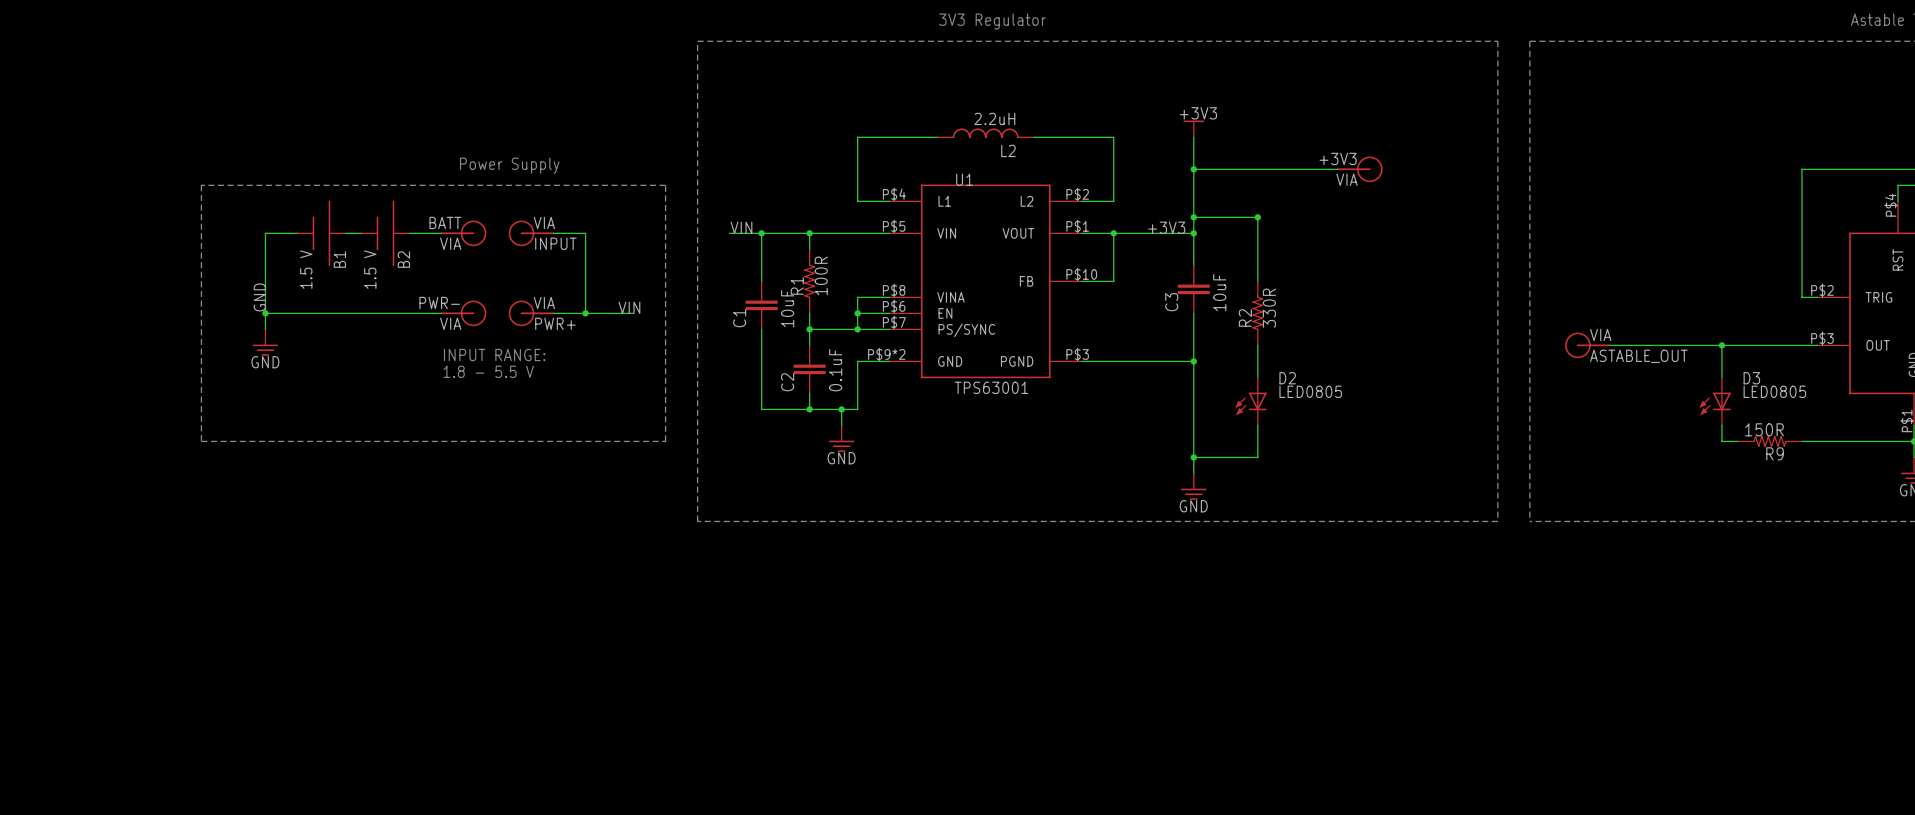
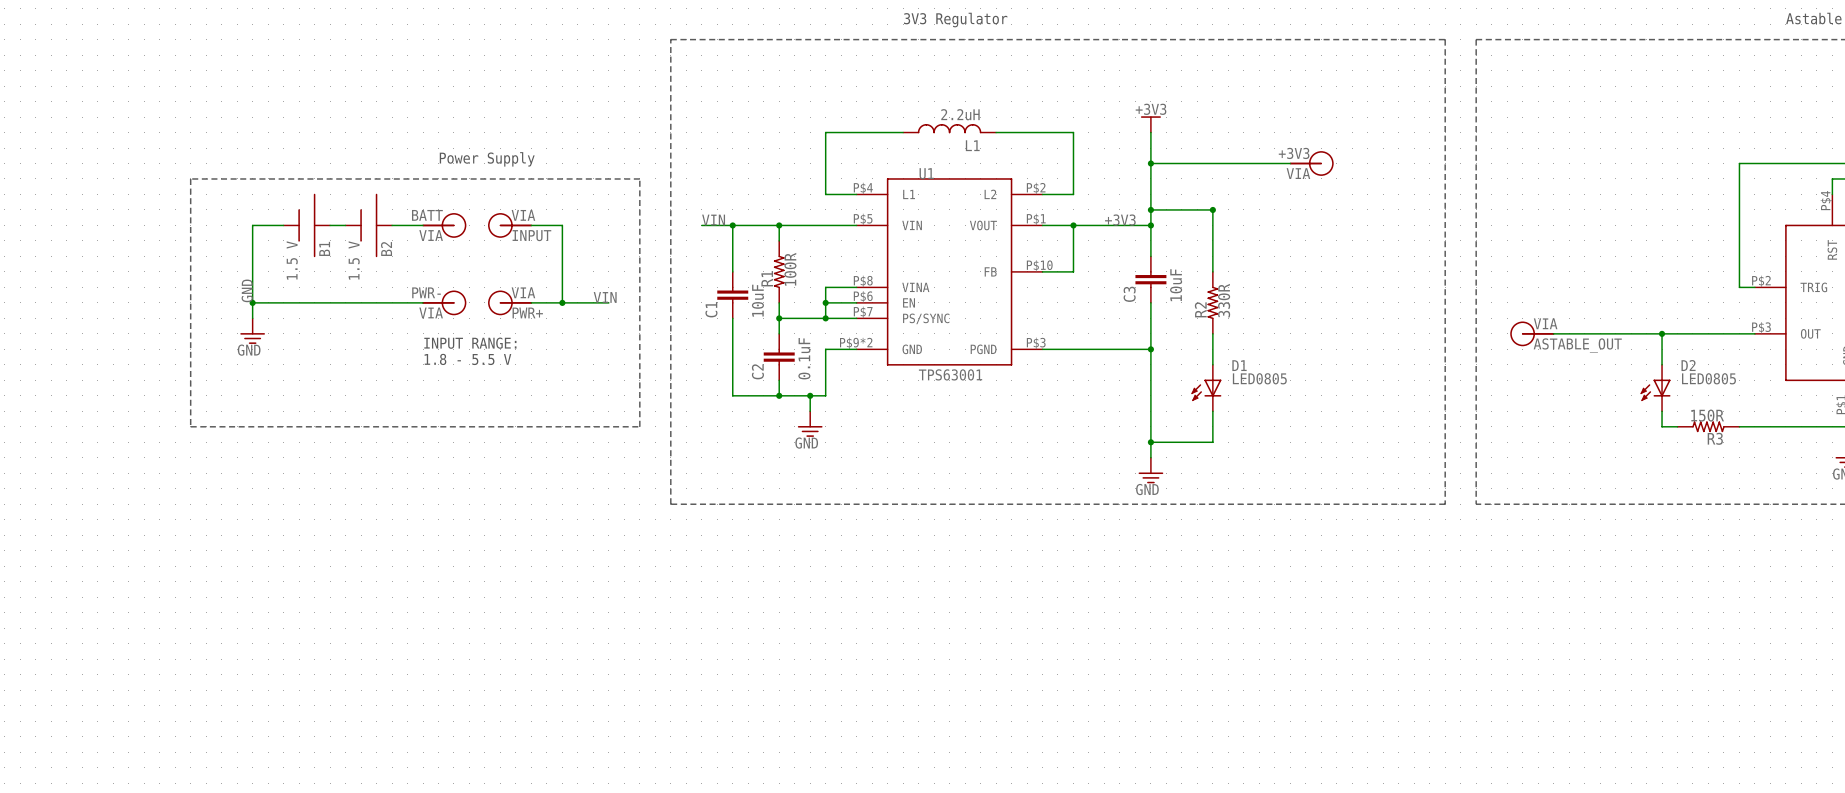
L2 name: L2 (1008, 150) -> L1 (972, 145)
D2 name: D2 (1287, 378) -> D1 (1239, 365)
D3 name: D3 (1751, 378) -> D2 (1688, 365)
R9 name: R9 (1775, 453) -> R3 (1715, 438)

